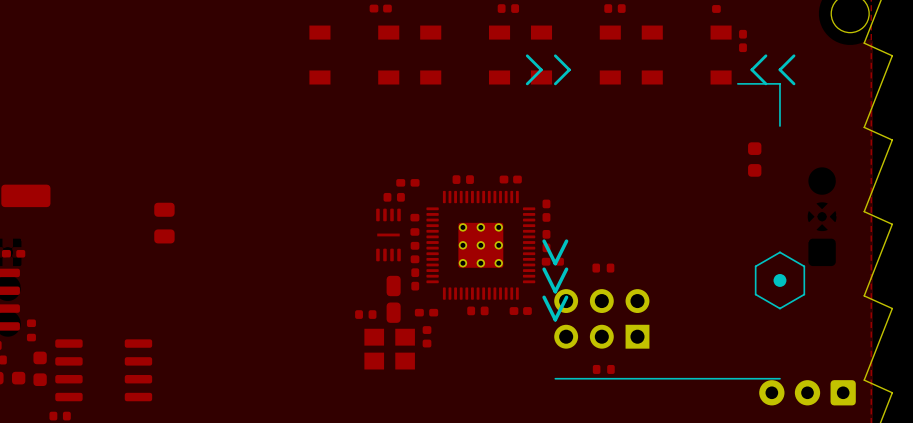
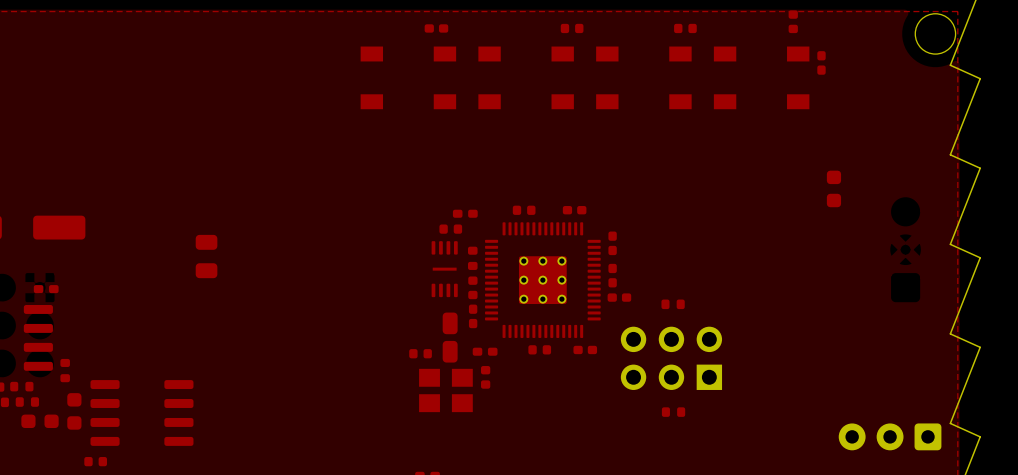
line: (527, 55) (541, 69) (527, 83) -> none
line: (555, 55) (569, 69) (555, 83) -> none
line: (765, 55) (751, 69) (765, 83) -> none
line: (794, 55) (779, 69) (794, 83) -> none
line: (737, 83) (779, 83) (779, 126) -> none
line: (566, 241) (555, 263) (544, 241) -> none
line: (779, 252) (804, 266) (804, 294) (779, 308) (755, 294) (755, 266) (779, 252) -> none
line: (566, 269) (555, 291) (544, 269) -> none
drawing: [773, 273, 787, 287] -> none
line: (566, 297) (555, 319) (544, 297) -> none
line: (779, 378) (555, 378) -> none

